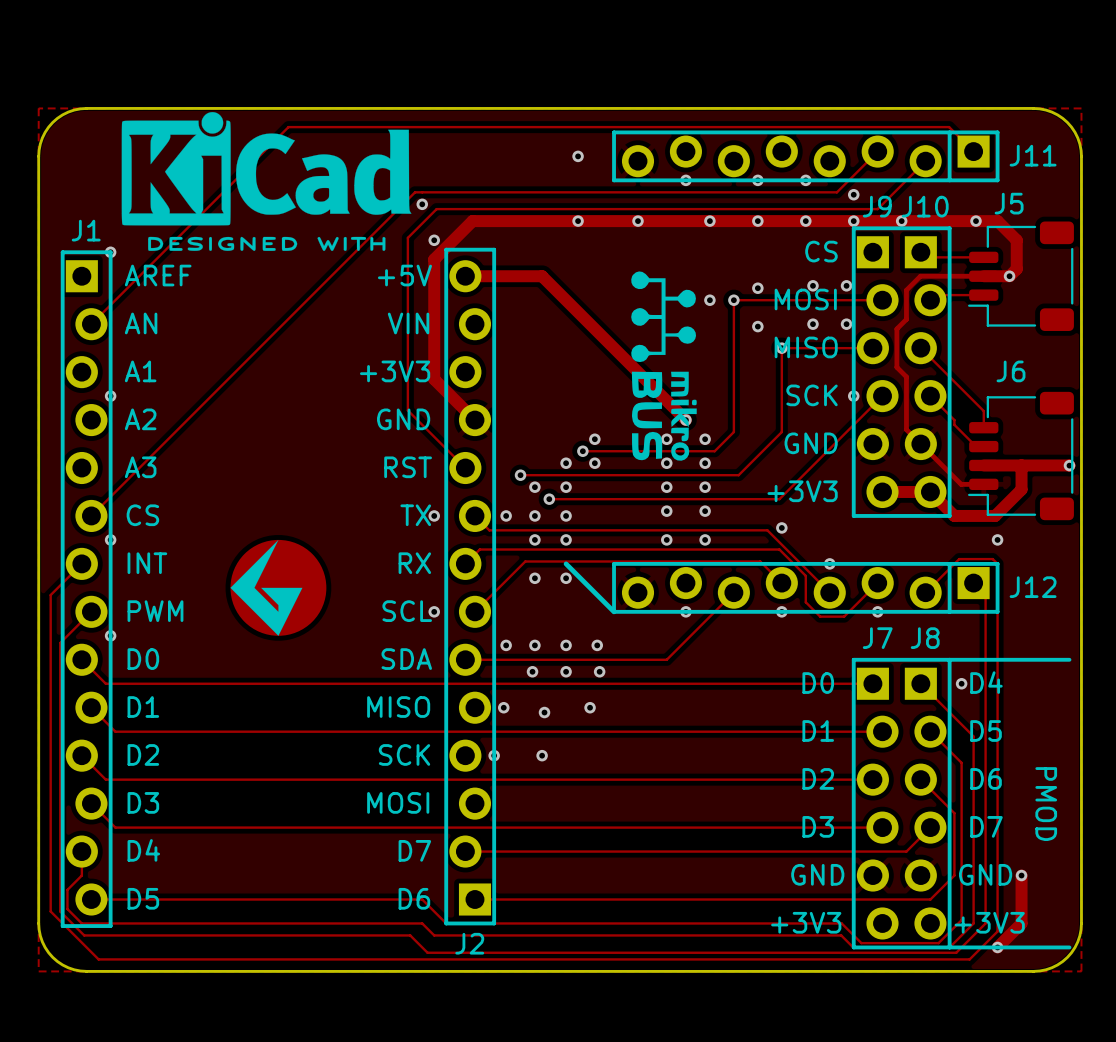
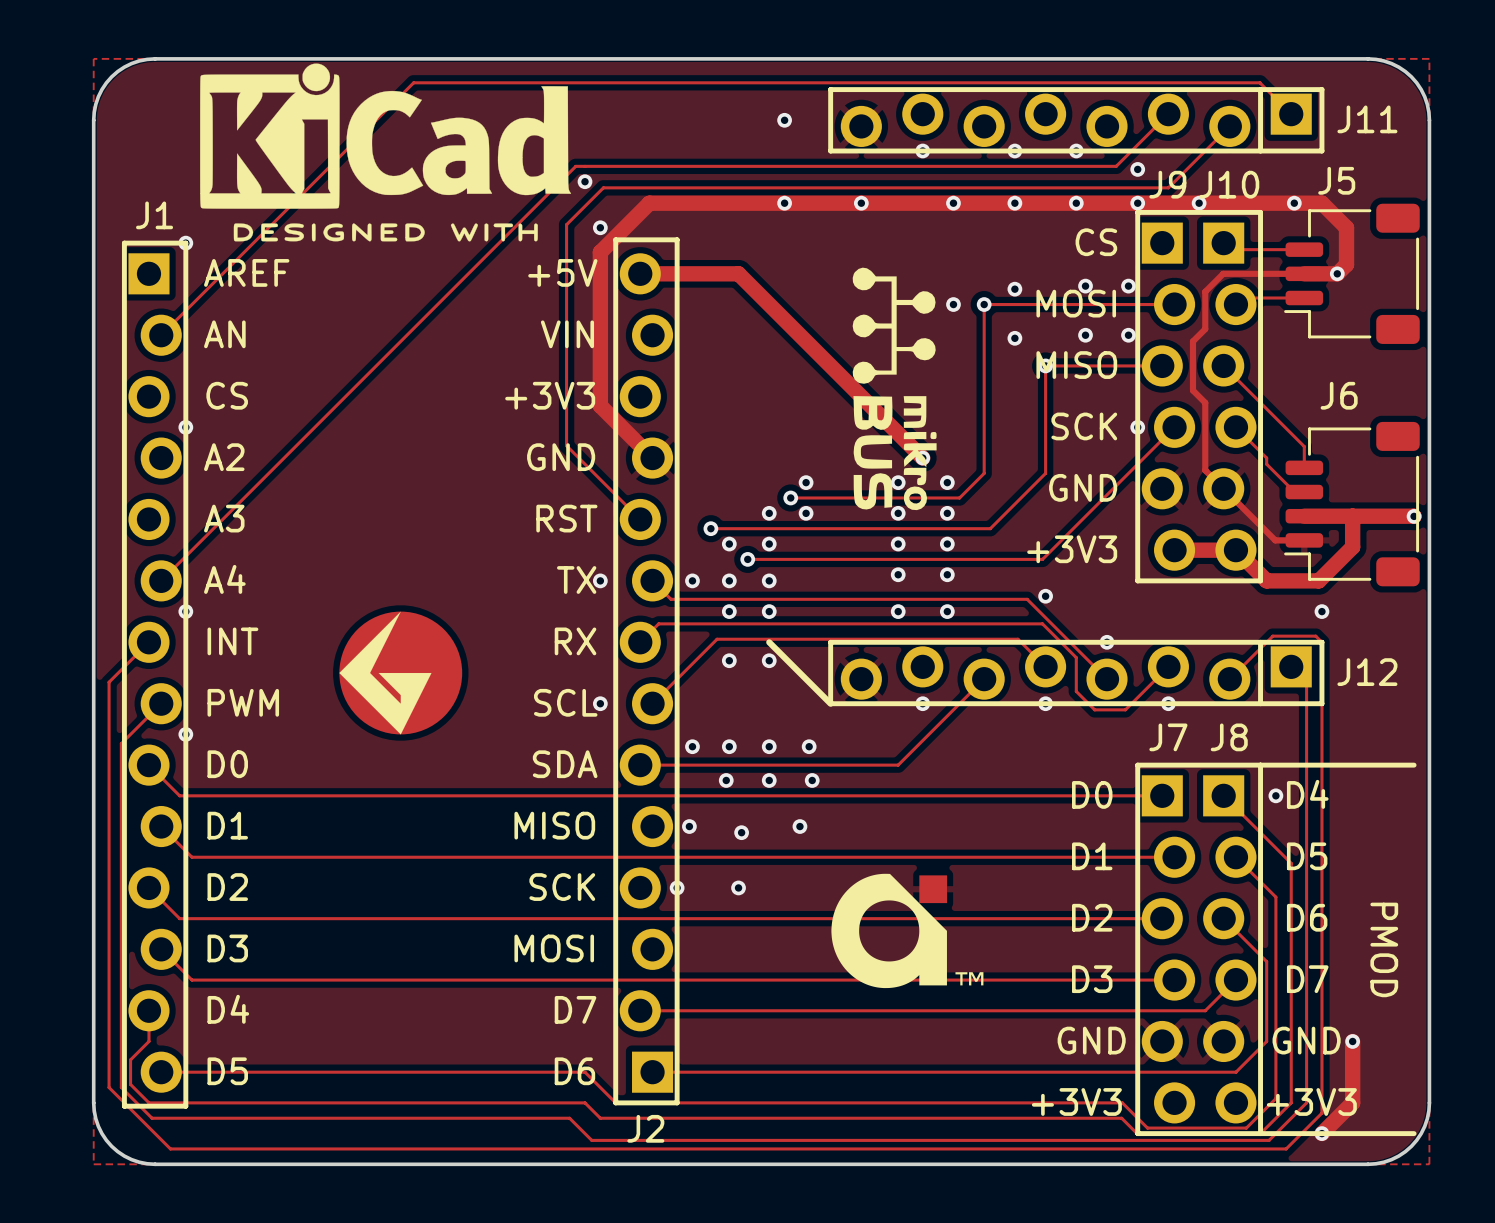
text: A1 (140, 371) -> CS (227, 395)
text: CS (142, 515) -> A4 (224, 579)
part: none -> (907, 930)

